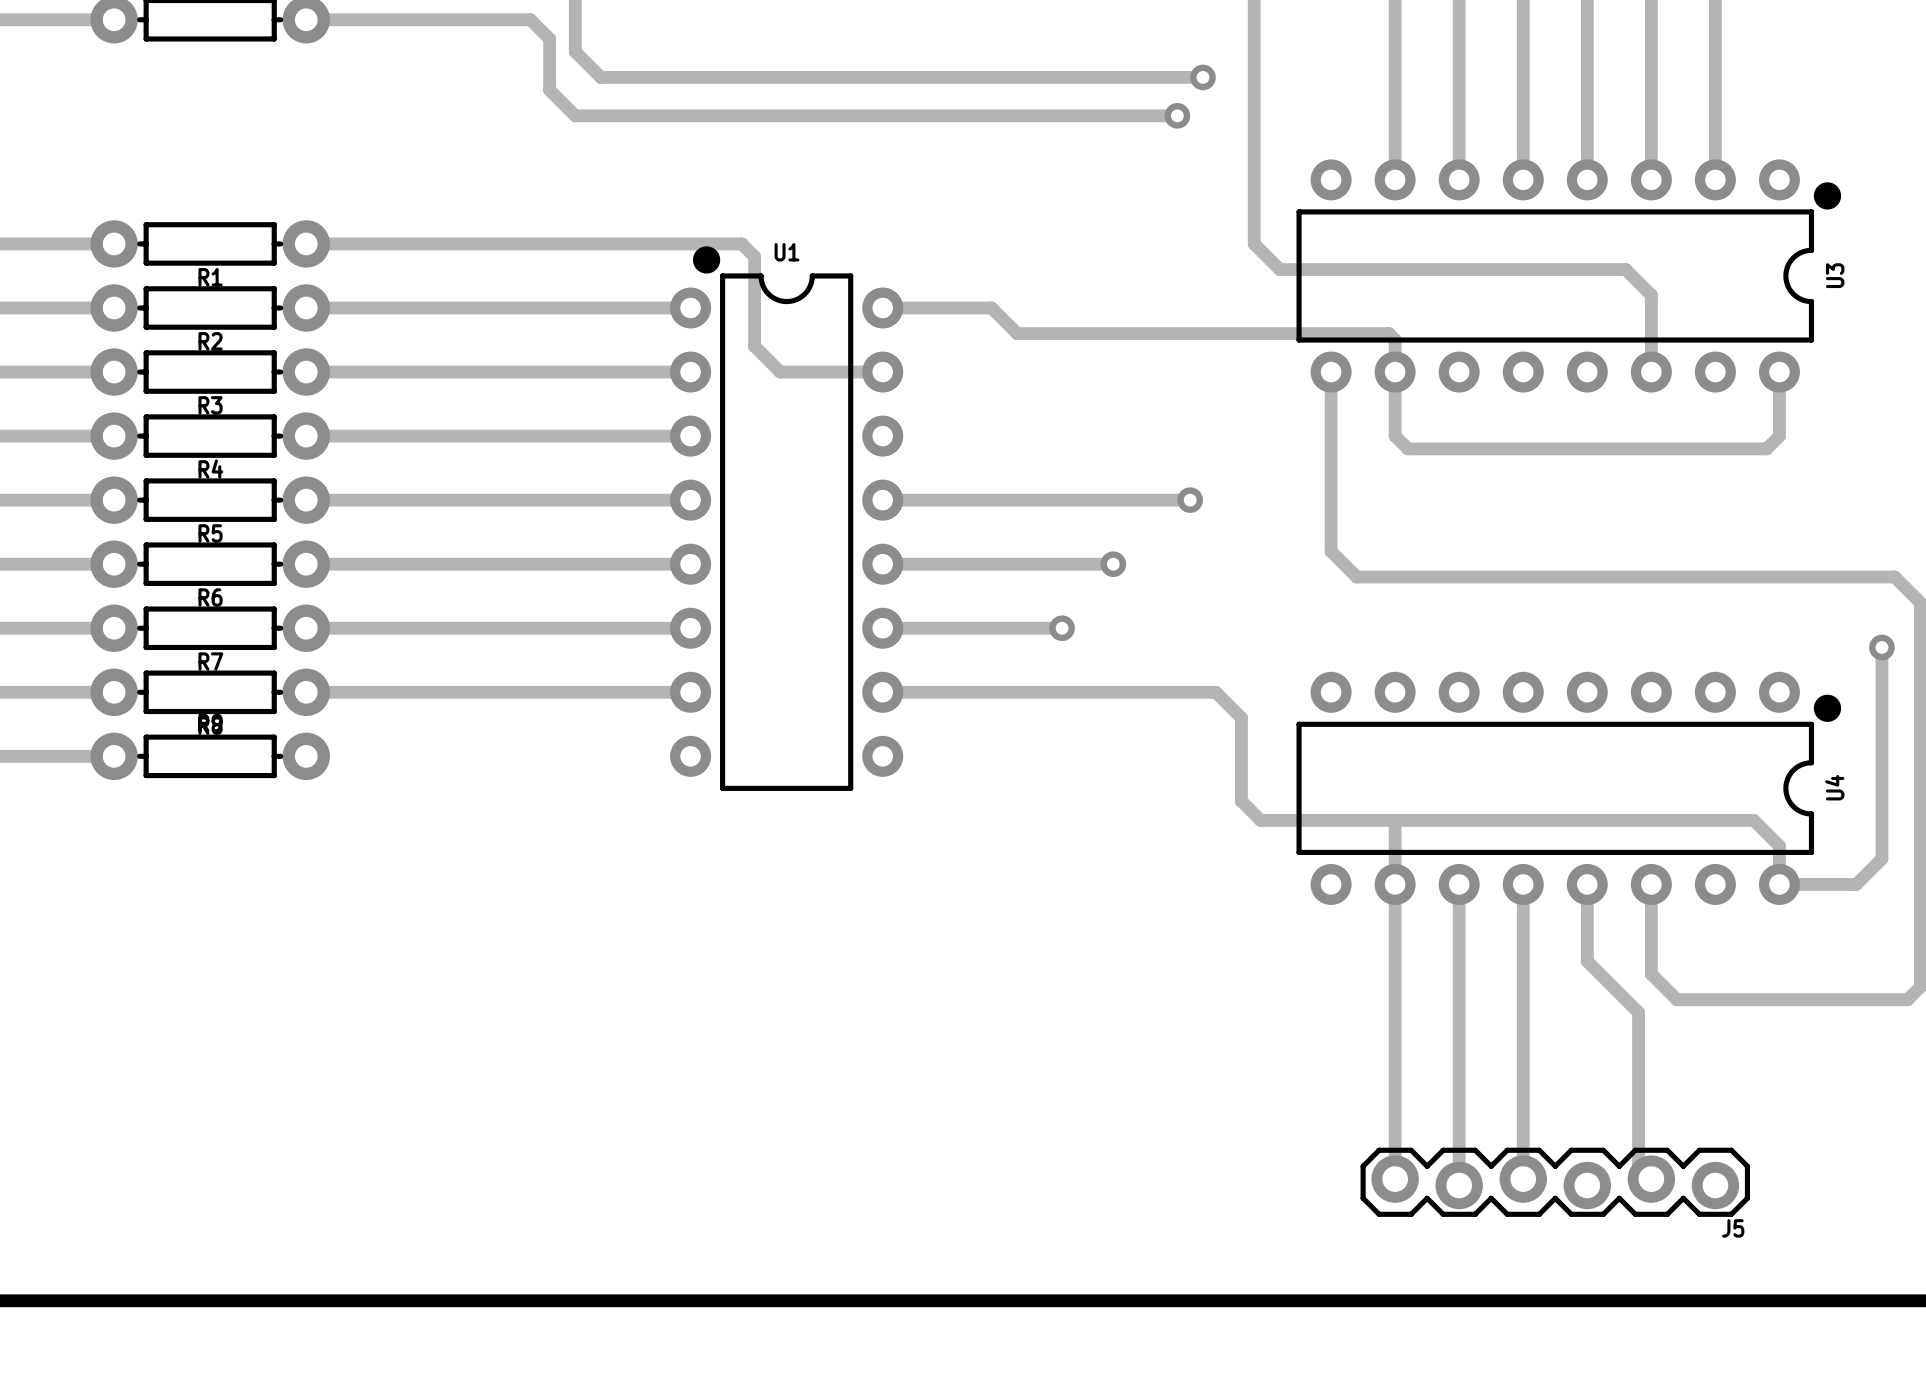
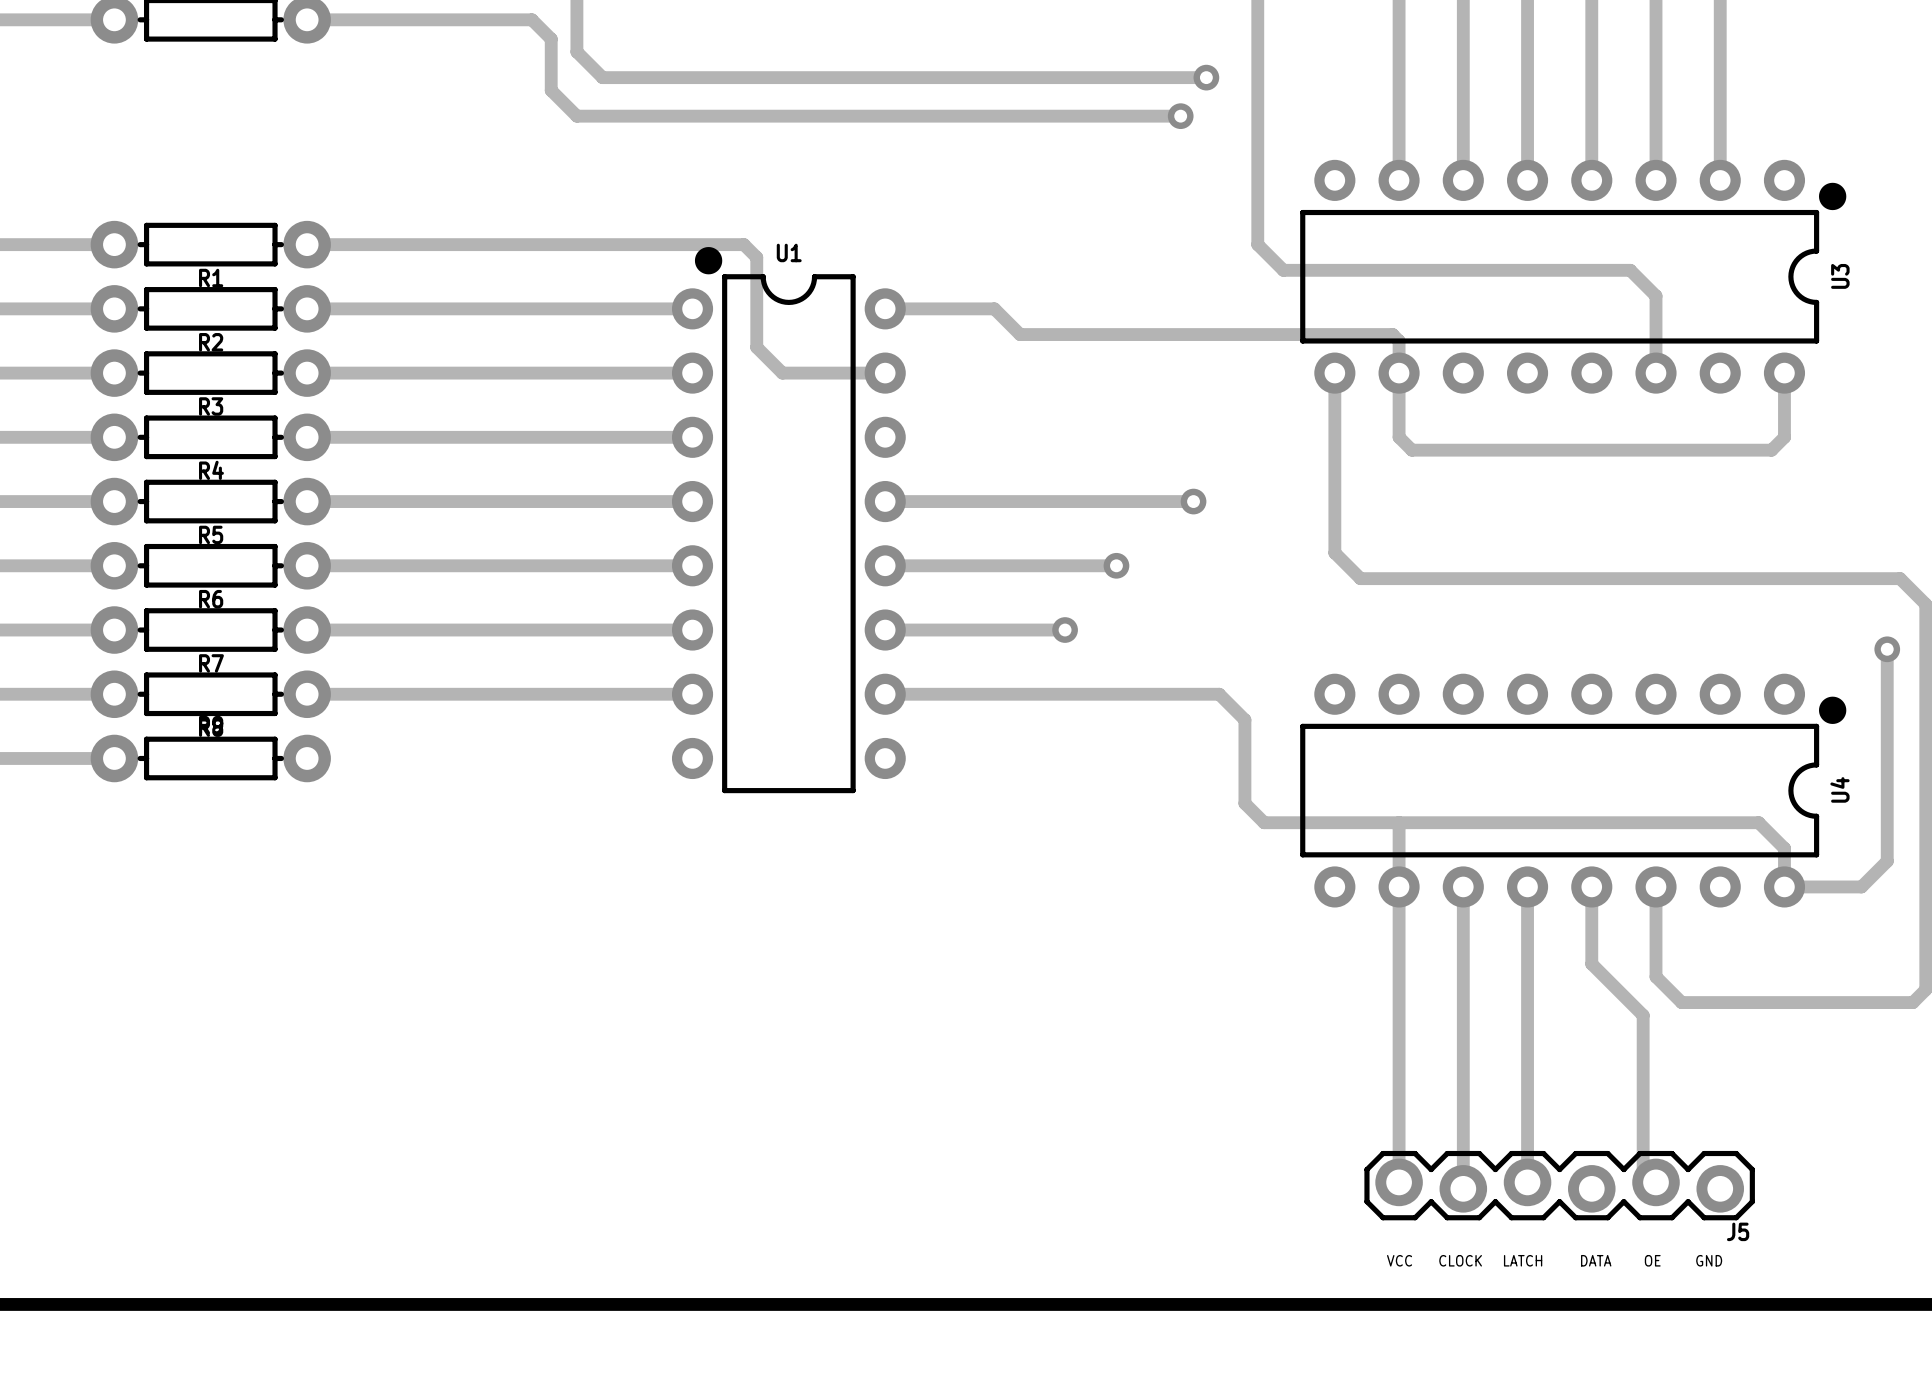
text: none -> VCC (1399, 1260)
text: none -> CLOCK (1460, 1260)
text: none -> LATCH (1523, 1260)
text: none -> DATA (1596, 1260)
text: none -> OE (1652, 1260)
text: none -> GND (1709, 1260)

